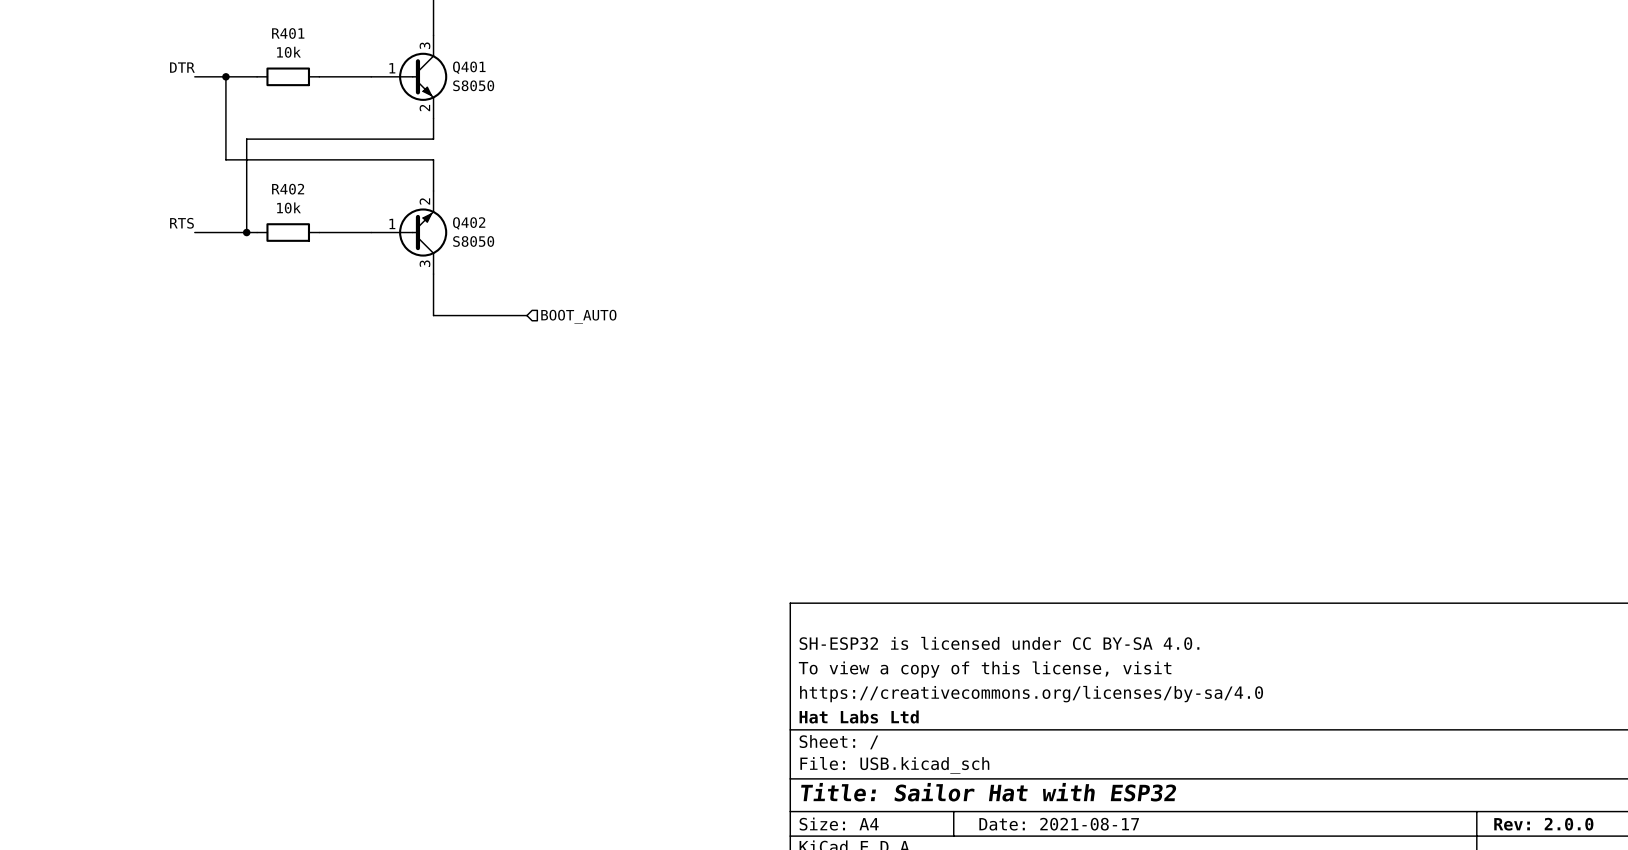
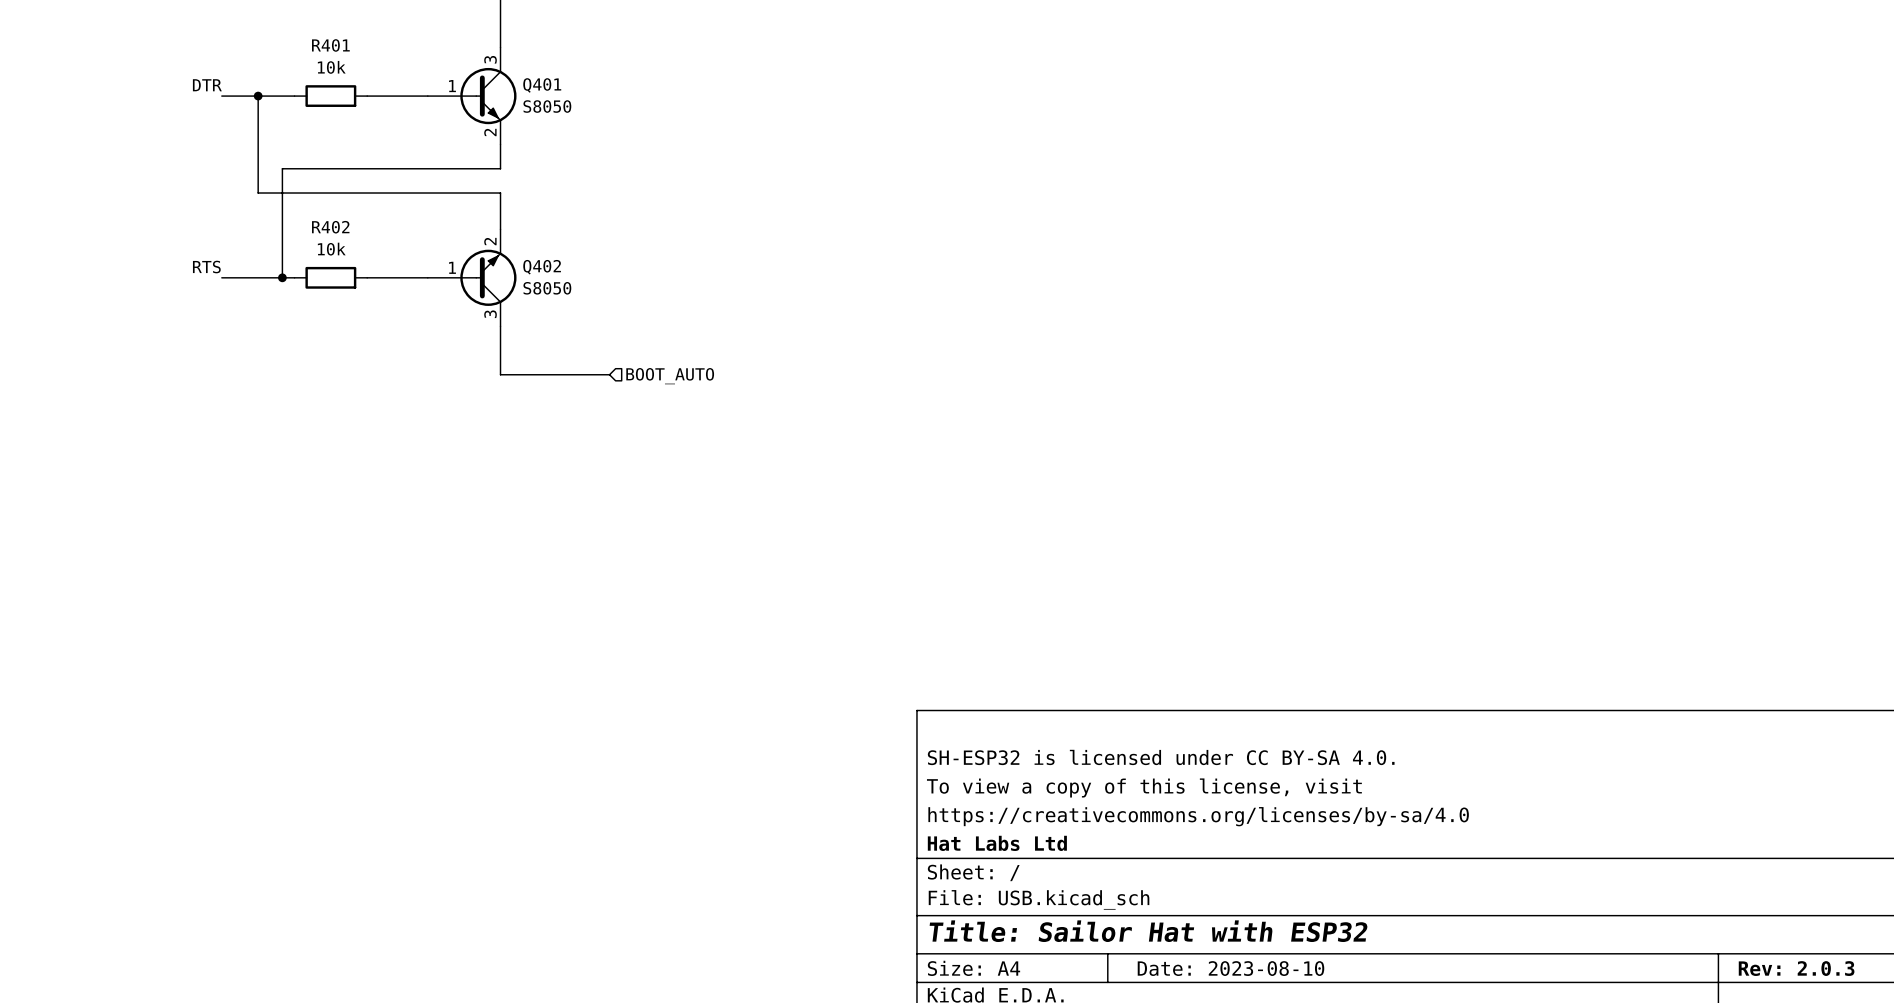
title block: Date: 2021-08-17 (1059, 824) -> Date: 2023-08-10 (1230, 968)
title block: Rev: 2.0.0 (1543, 824) -> Rev: 2.0.3 (1796, 968)

